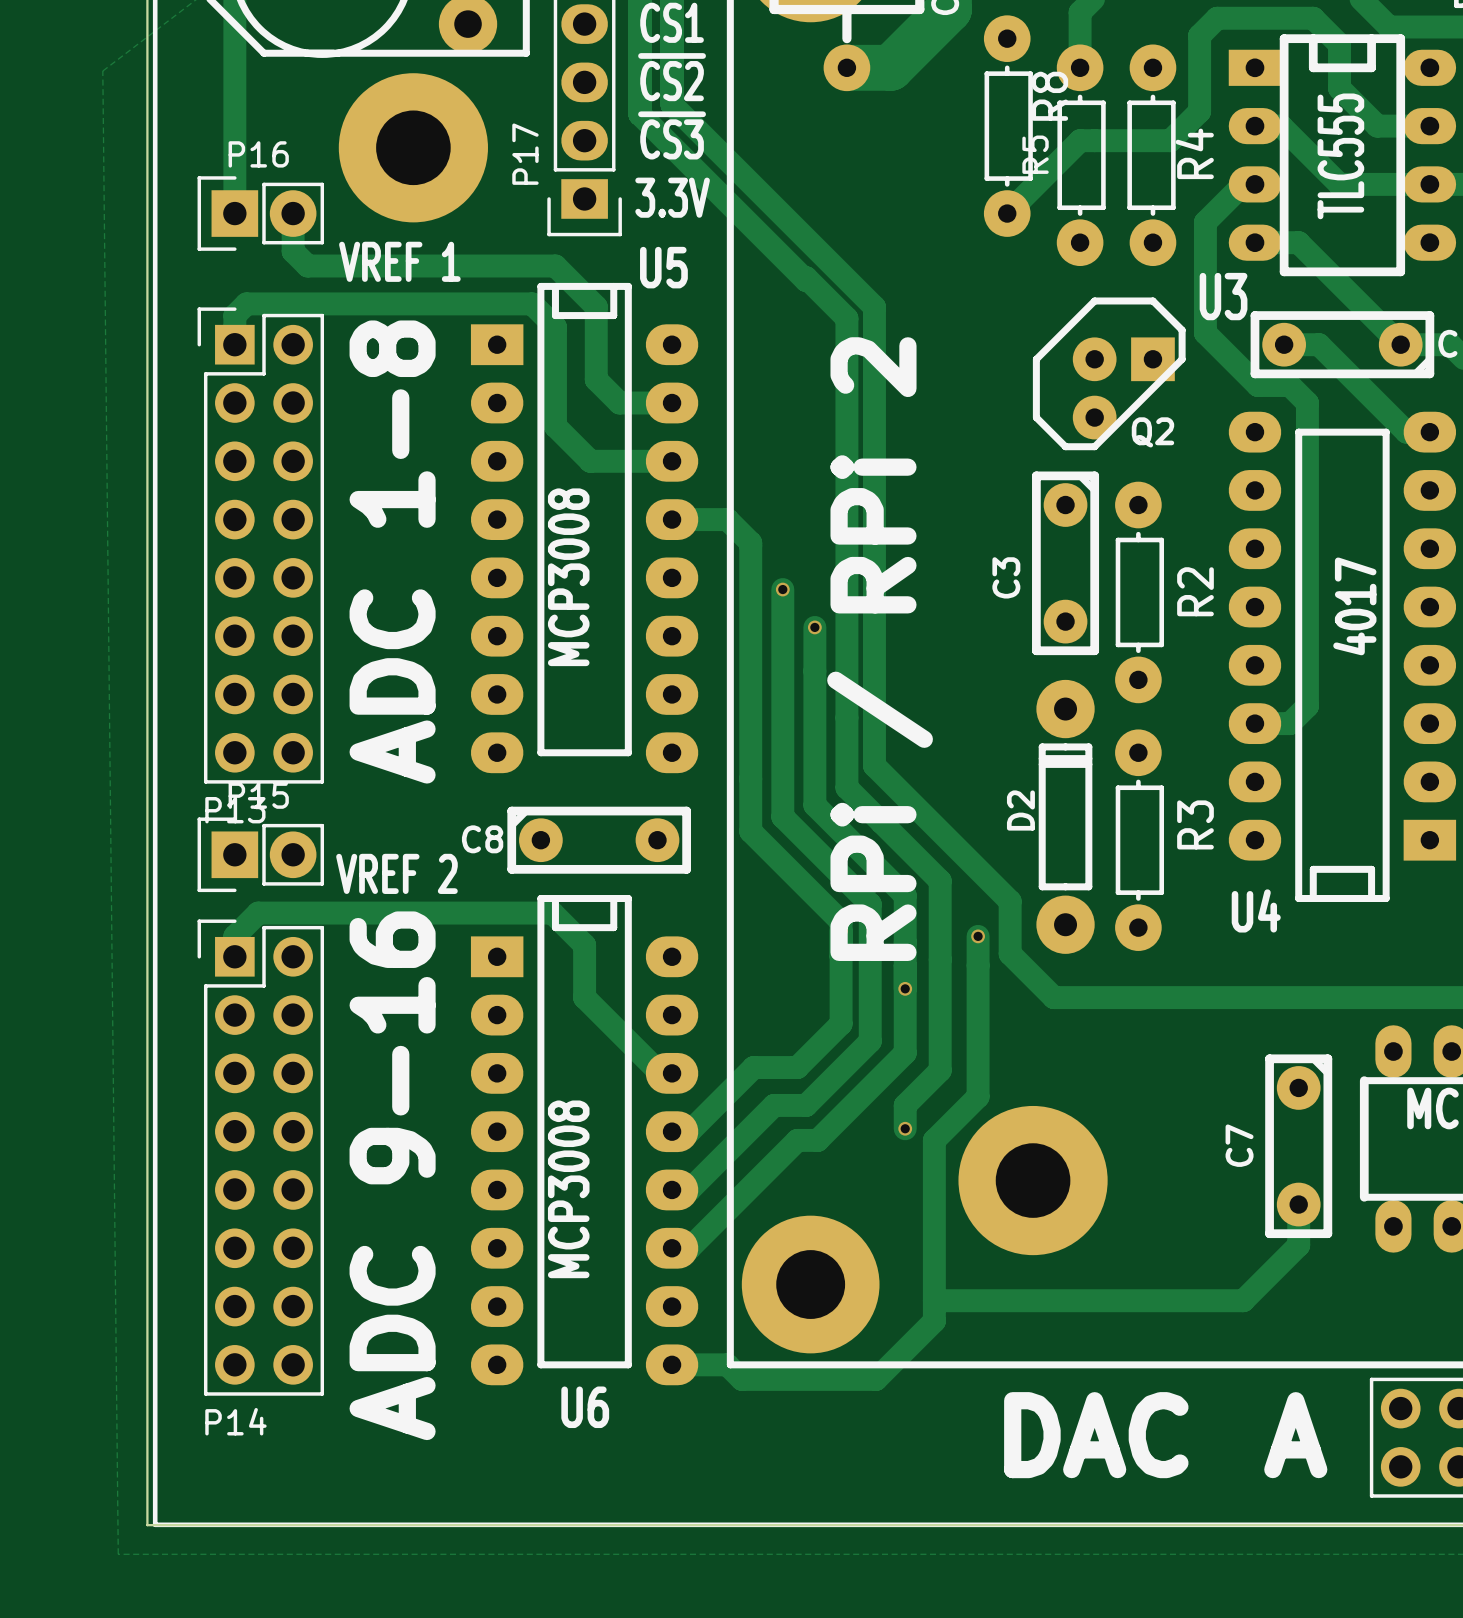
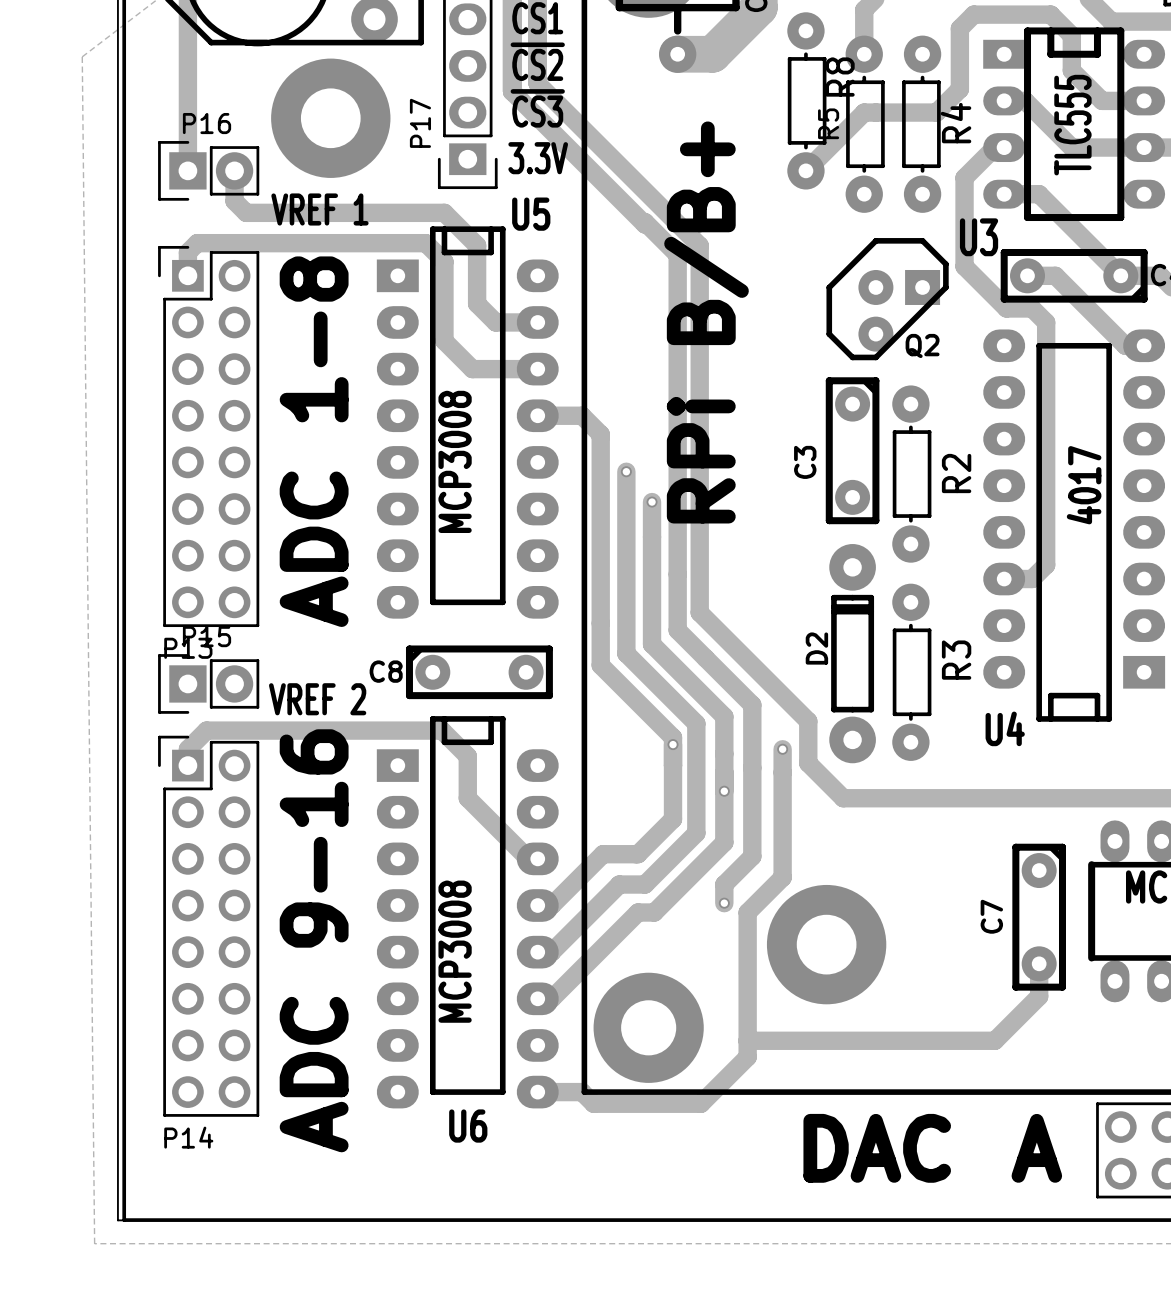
text: none -> RPi B/B+ (706, 322)
text: RPi / RPi 2 (880, 649) -> none

